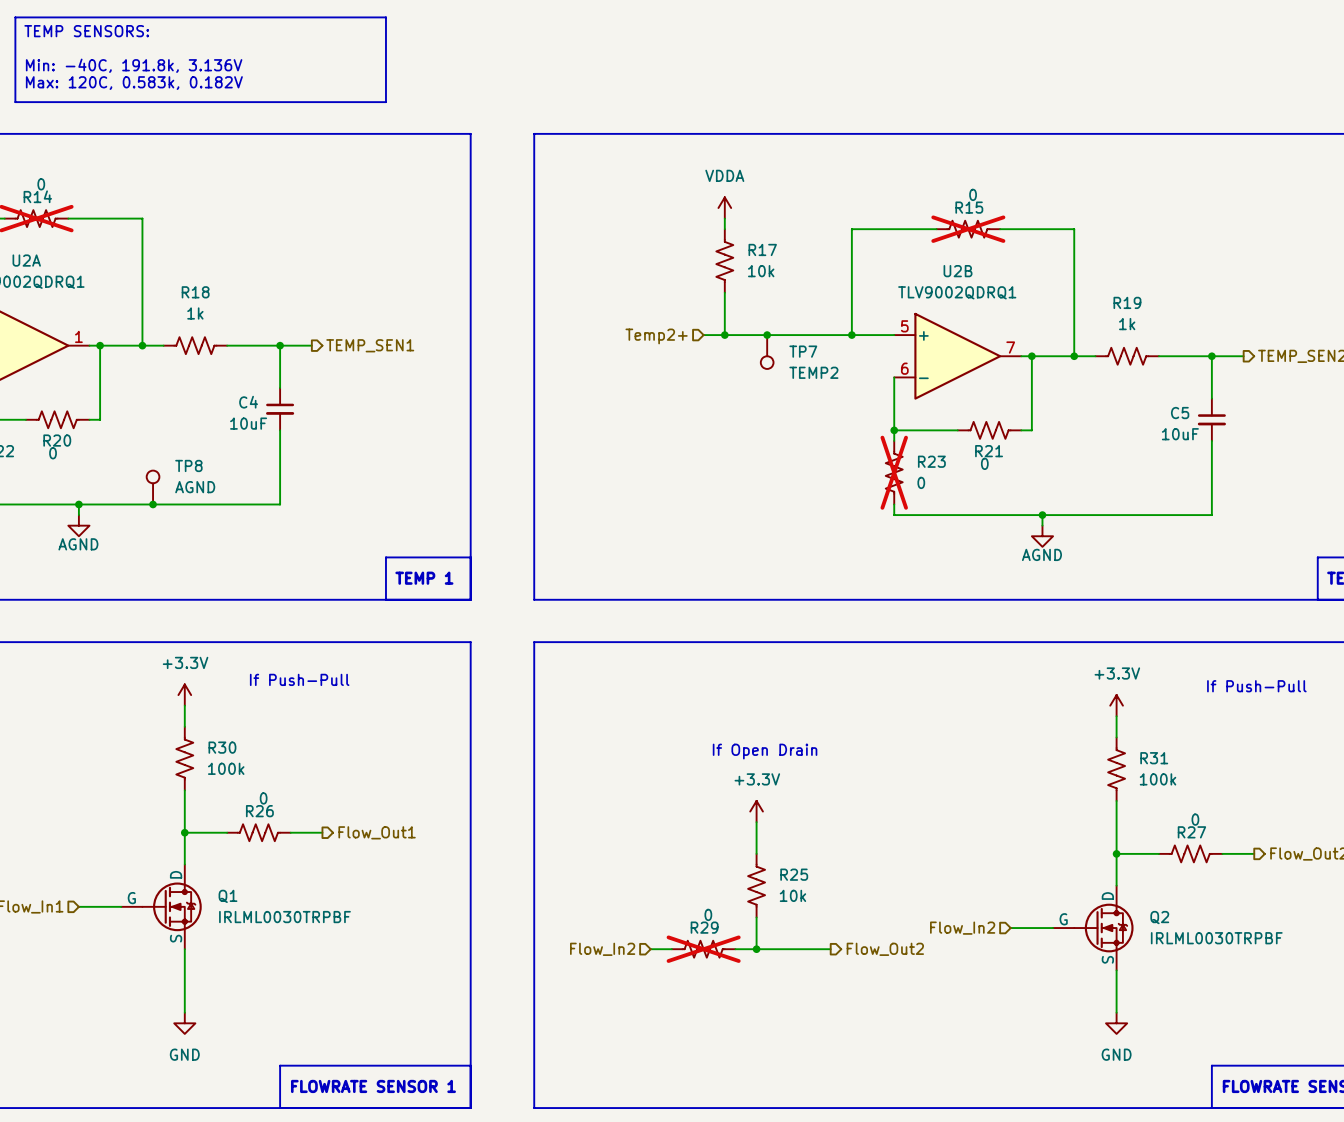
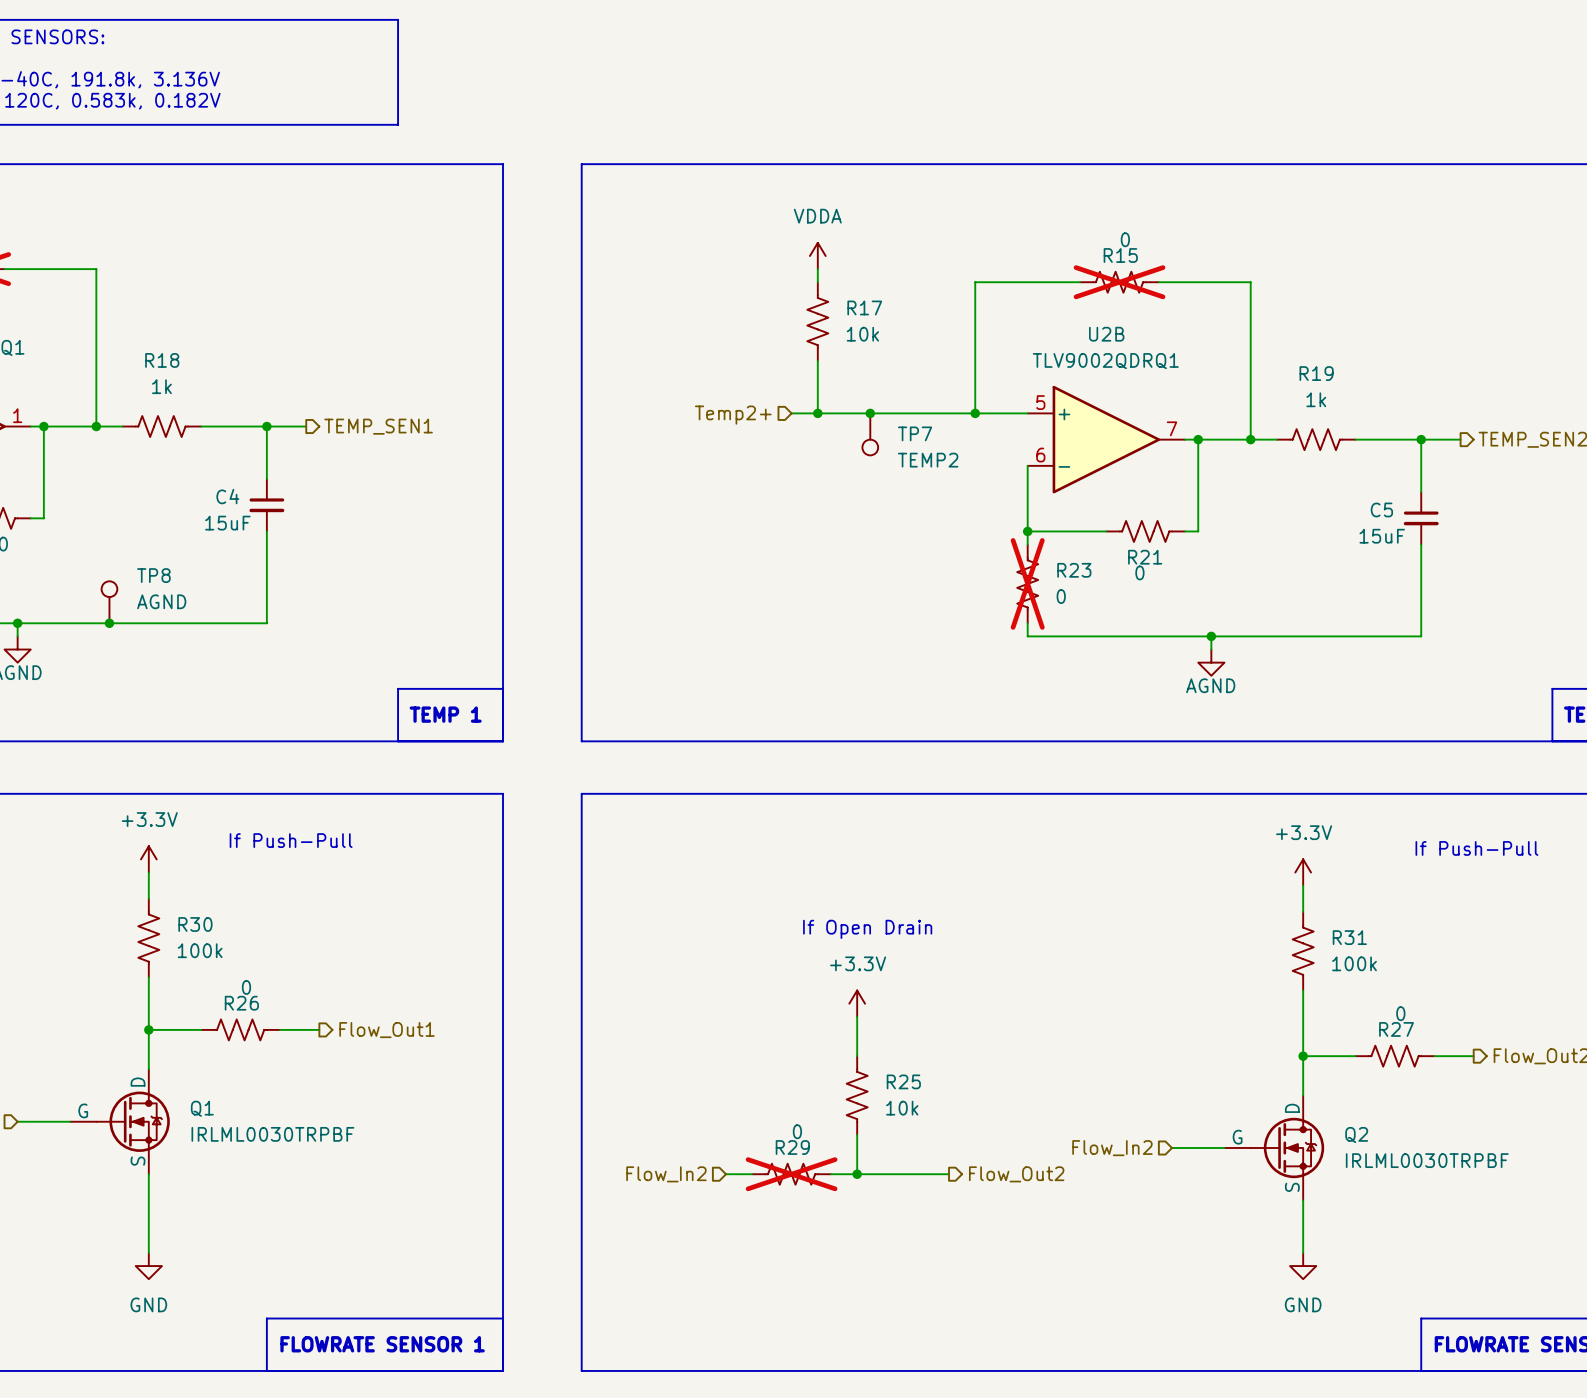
C4 value: 10uF (248, 423) -> 15uF (227, 523)
C5 value: 10uF (1180, 434) -> 15uF (1382, 536)

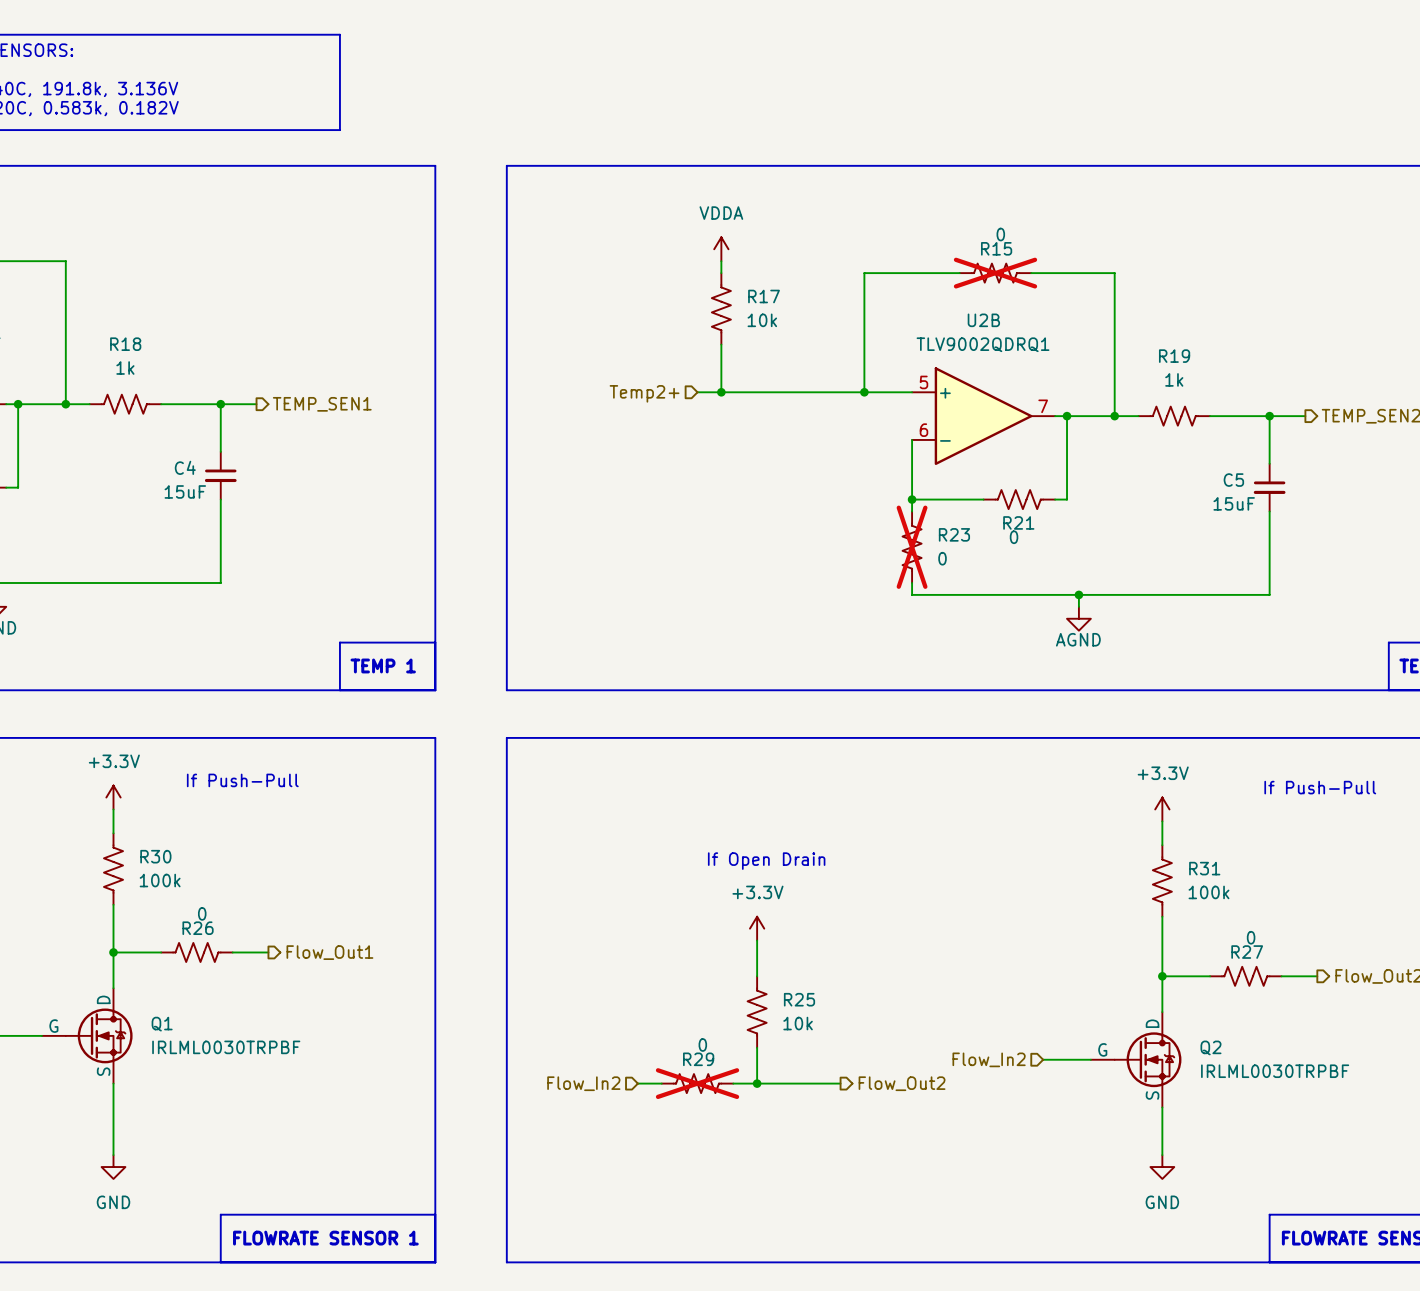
junction: (870, 413) -> none
TP7: TEMP2 (870, 434) -> none
TP8: AGND (109, 602) -> none
junction: (109, 623) -> none

